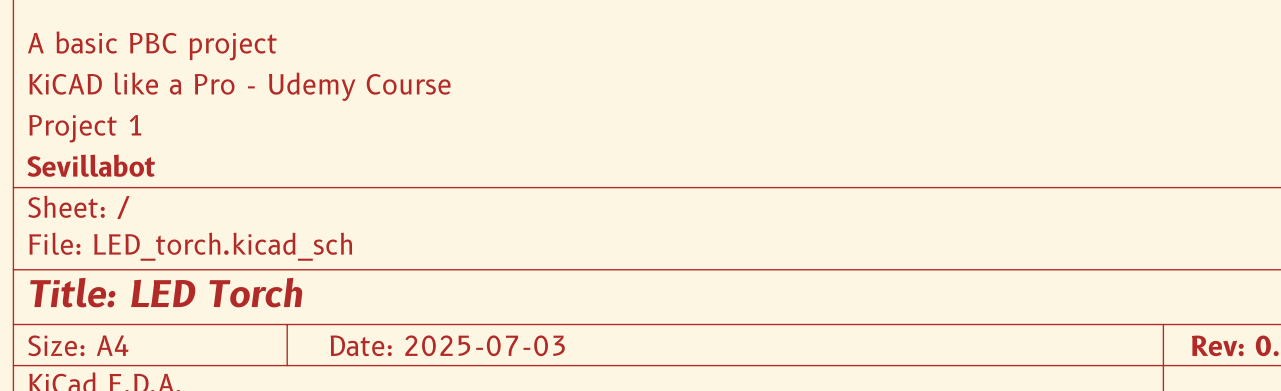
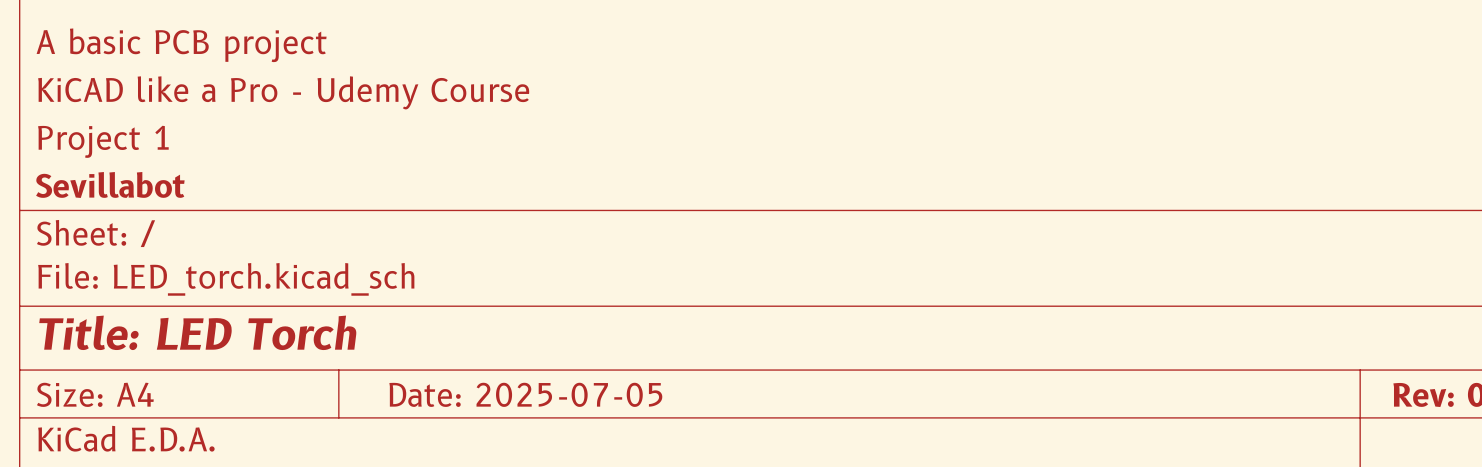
title block: A basic PBC project (152, 45) -> A basic PCB project (181, 45)
title block: Date: 2025-07-03 (447, 345) -> Date: 2025-07-05 (525, 394)

